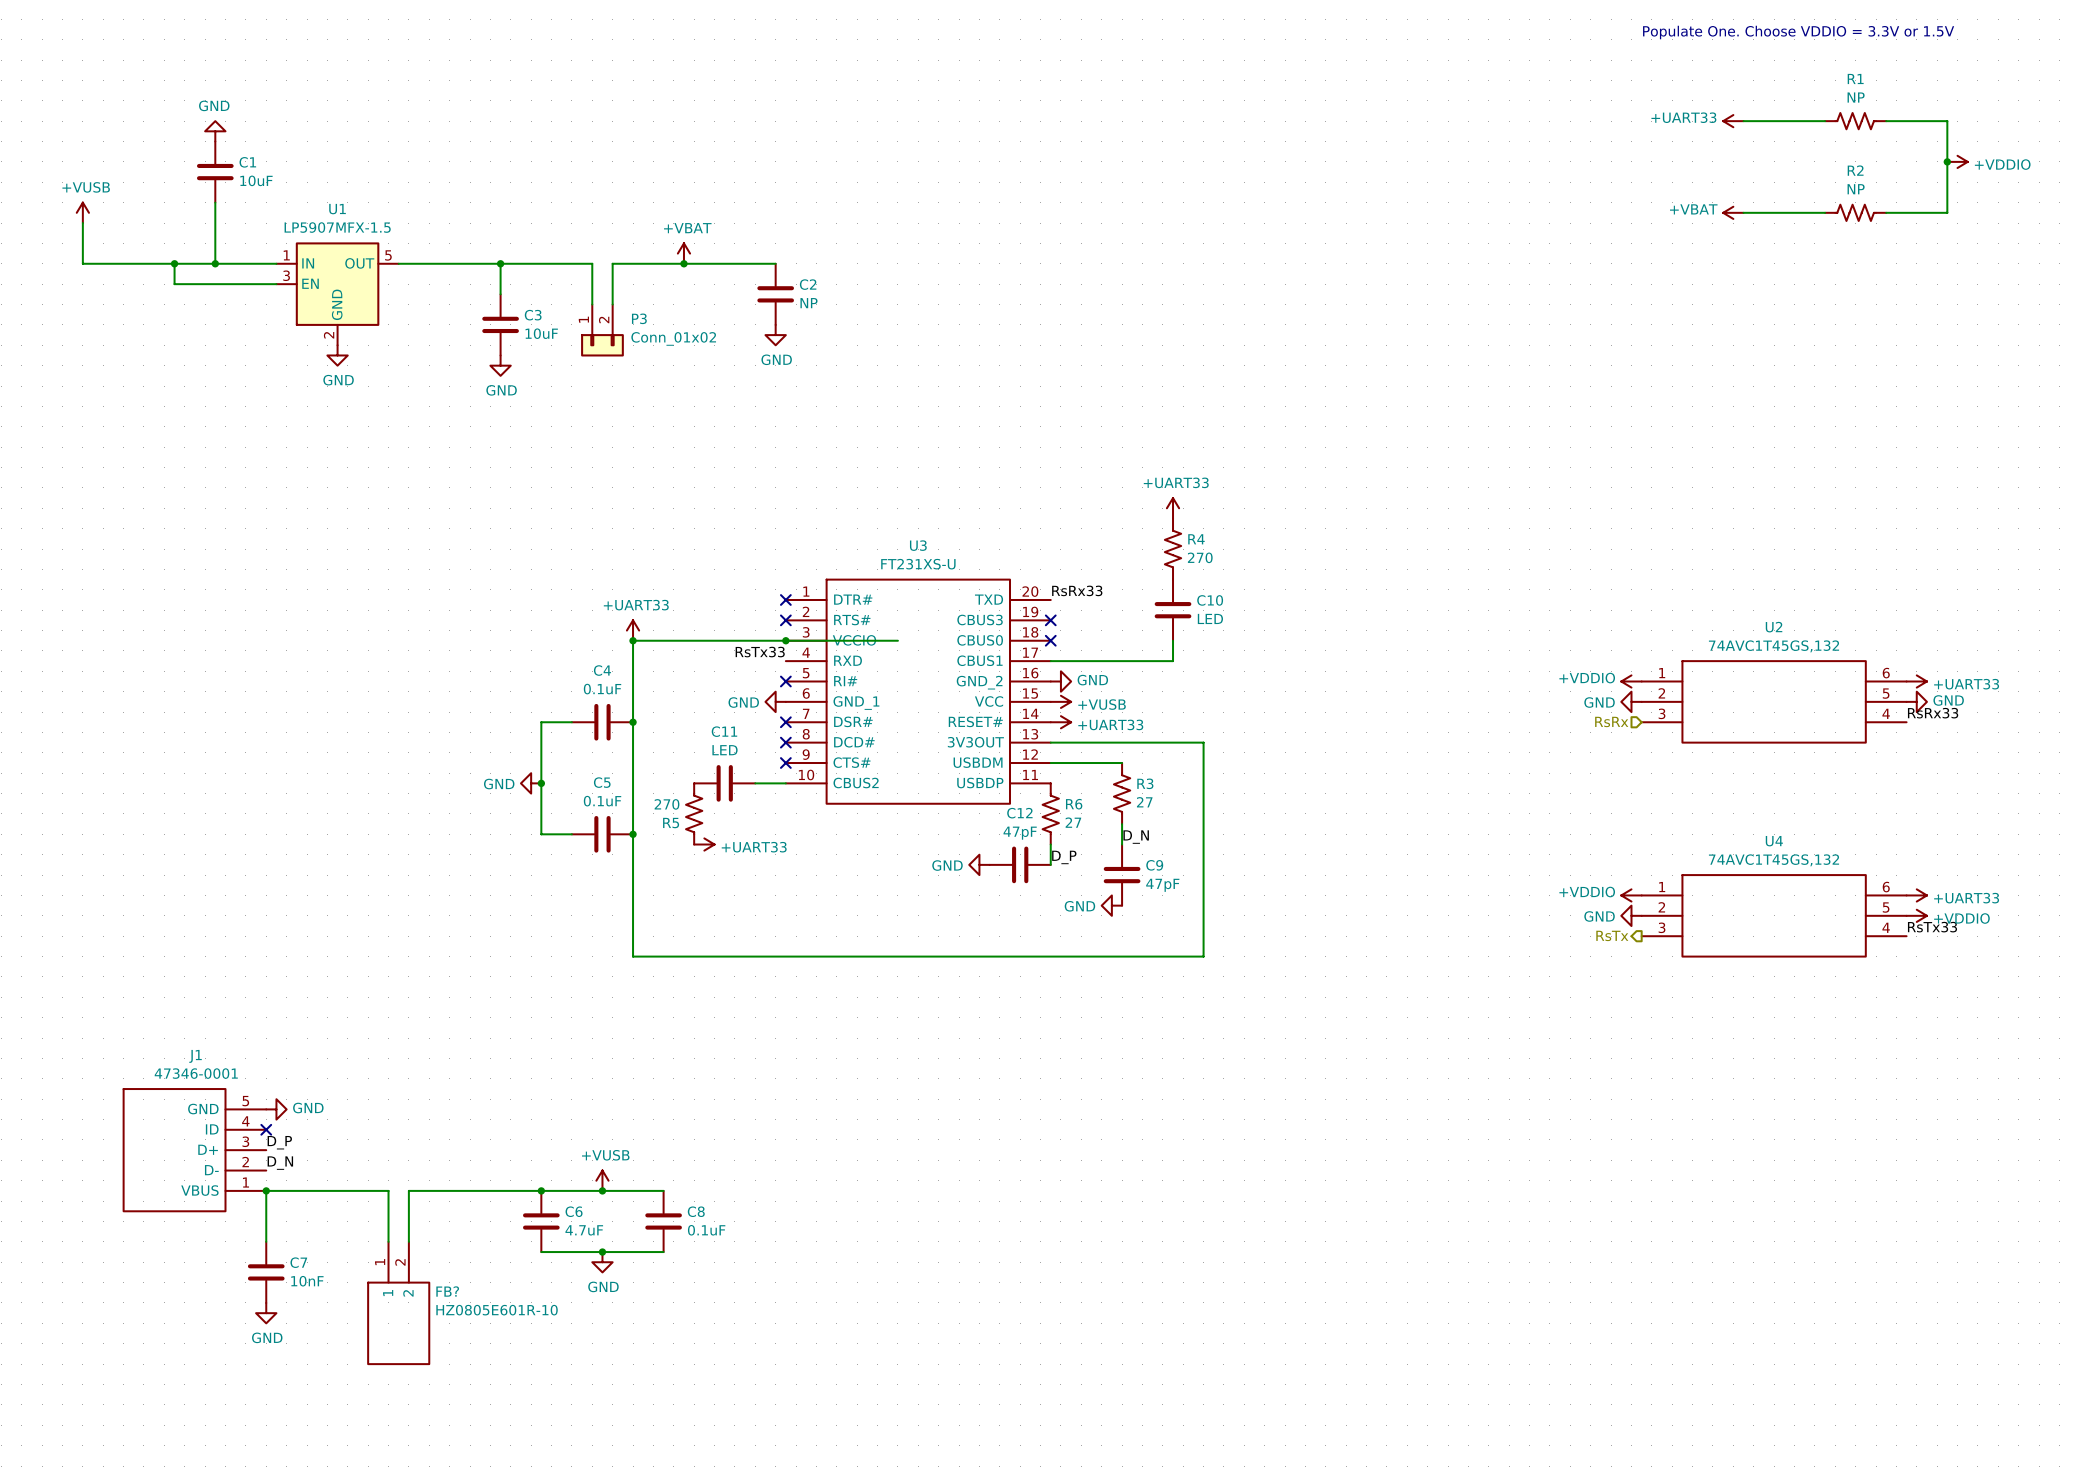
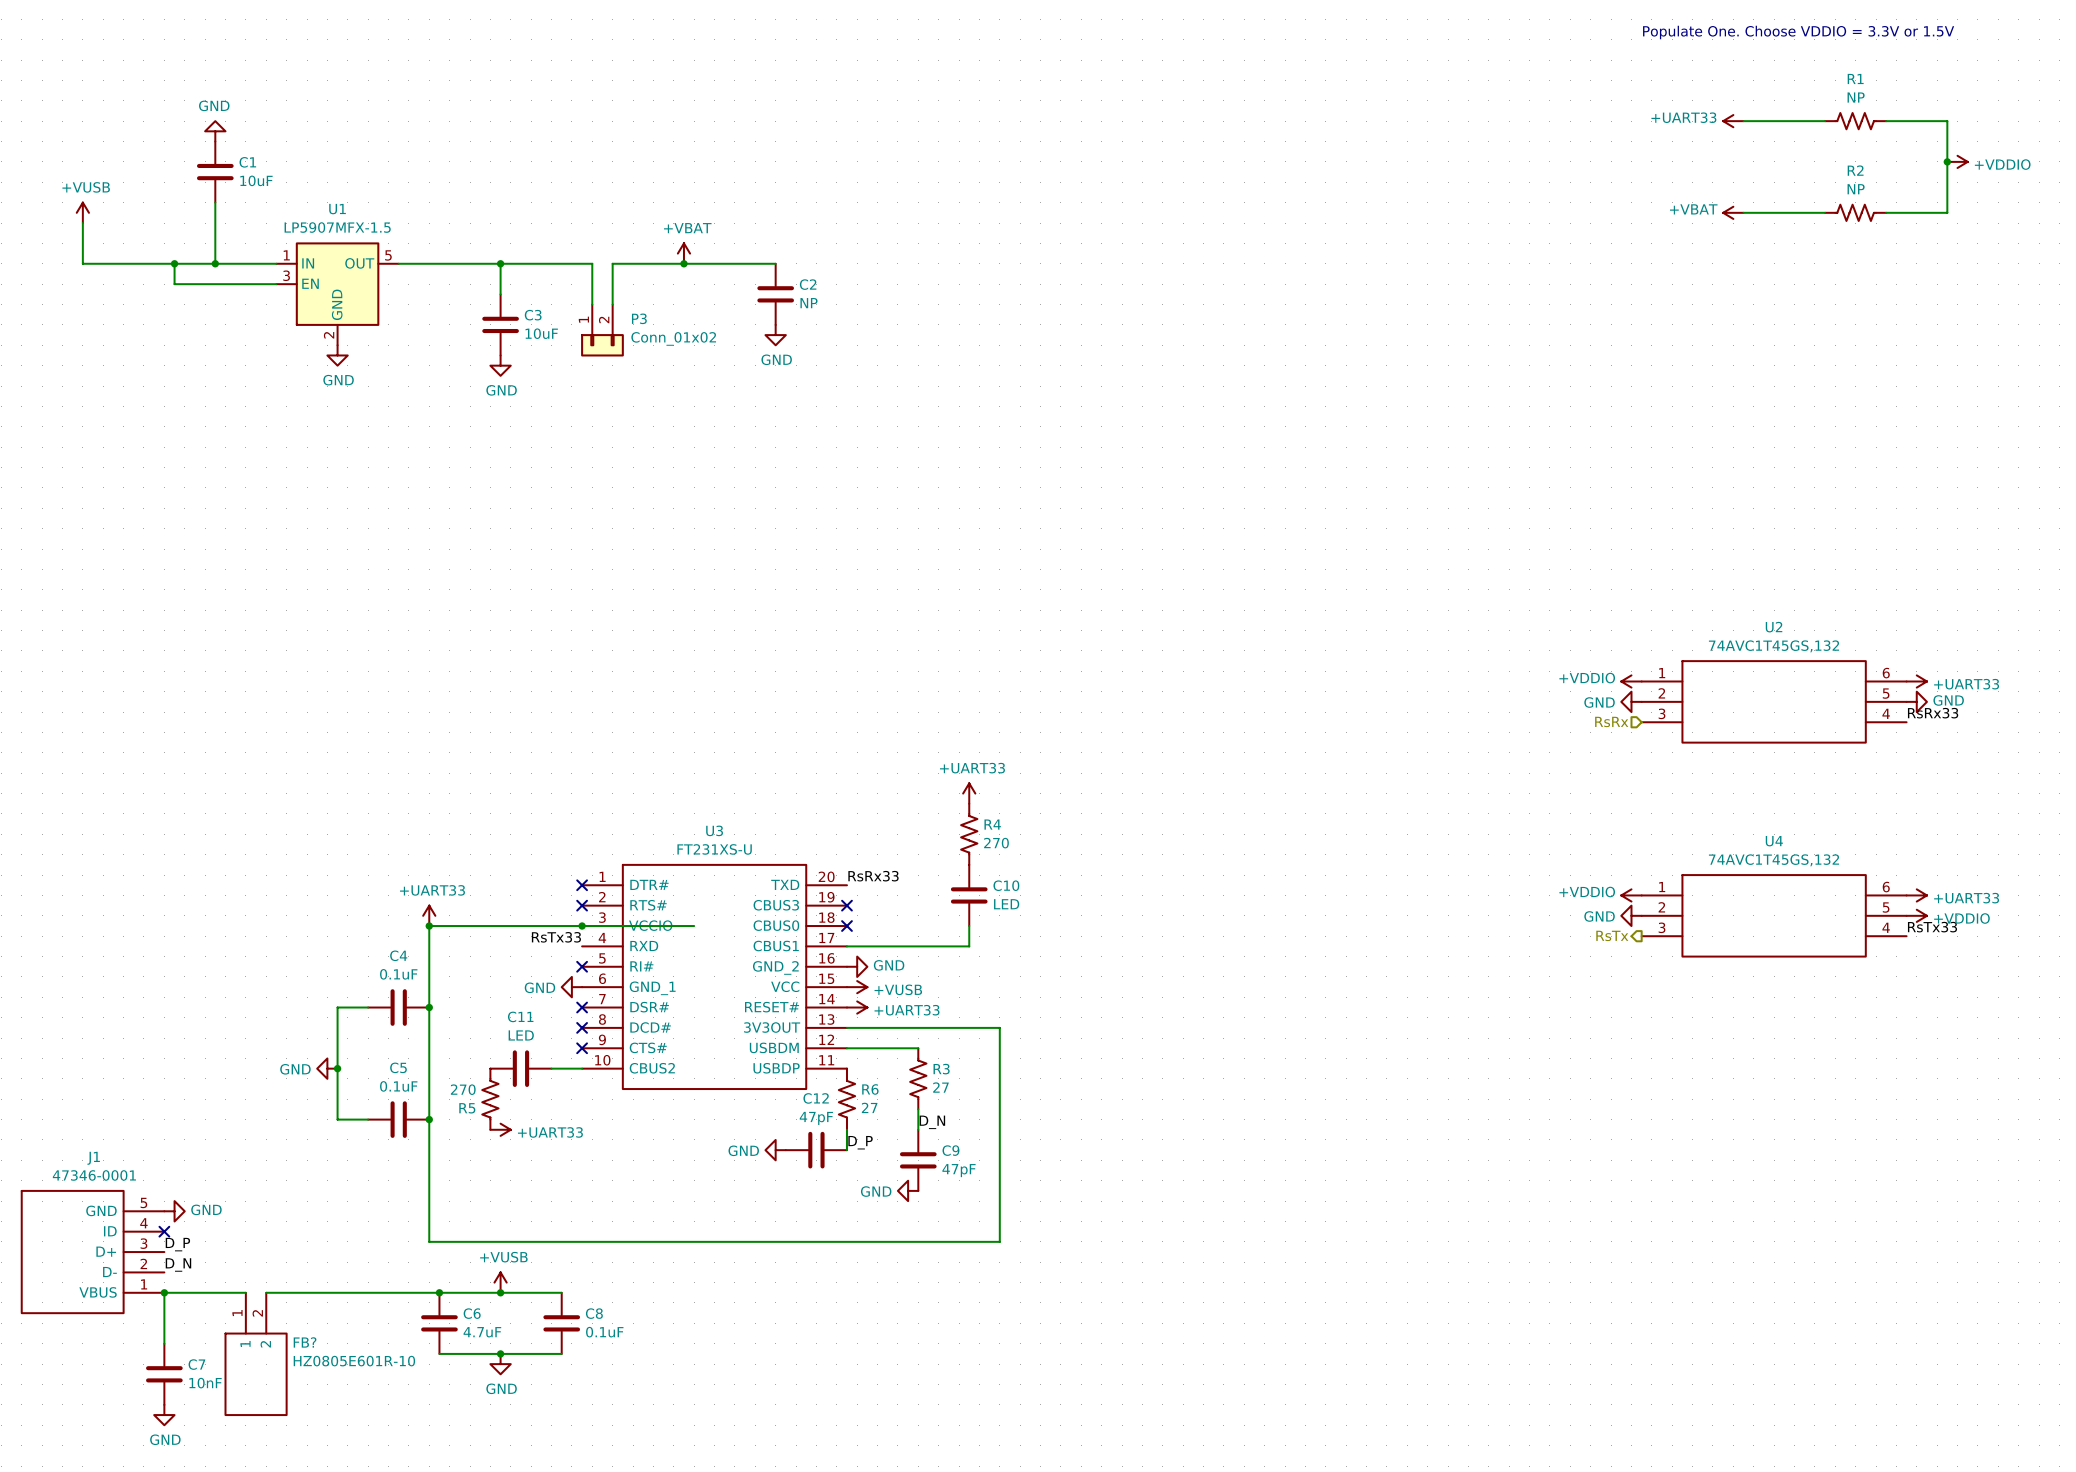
power symbol: +UART33 (1173, 508) -> none
R4 position: (1173, 549) -> (969, 834)
label: RsRx33 (1077, 590) -> none
no-connect mark: (785, 599) -> none
C10 position: (1173, 610) -> (969, 895)
no-connect mark: (785, 620) -> none
no-connect mark: (1050, 620) -> none
power symbol: +UART33 (633, 630) -> none
junction: (633, 640) -> none
junction: (785, 640) -> none
wire: (897, 640) (633, 640) (633, 956) (1203, 956) (1203, 742) (1050, 742) -> none
no-connect mark: (1050, 640) -> none
wire: (1173, 640) (1173, 661) (1050, 661) -> none
label: RsTx33 (760, 652) -> none
no-connect mark: (785, 681) -> none
power symbol: GND (1060, 681) -> none
U3 position: (918, 691) -> (714, 976)
power symbol: GND (775, 701) -> none
power symbol: +VUSB (1060, 701) -> none
wire: (571, 722) (541, 722) (541, 834) (571, 834) -> none
C4 position: (602, 722) -> (398, 1007)
junction: (633, 722) -> none
no-connect mark: (785, 722) -> none
power symbol rotation: 0° (1060, 722) -> 90° counterclockwise (969, 793)
power symbol position: +UART33 (1060, 722) -> +UART33 (969, 793)
power symbol text position: +UART33 (1110, 724) -> +UART33 (972, 768)
no-connect mark: (785, 742) -> none
no-connect mark: (785, 763) -> none
wire: (1050, 763) (1122, 763) -> none
power symbol: GND (531, 783) -> none
junction: (541, 783) -> none
C11 position: (724, 783) -> (520, 1068)
wire: (755, 783) (785, 783) -> none
R3 position: (1122, 793) -> (918, 1078)
R5 position: (694, 813) -> (490, 1099)
R6 position: (1050, 813) -> (846, 1099)
wire: (1122, 824) (1122, 844) -> none
C5 position: (602, 834) -> (398, 1119)
junction: (633, 834) -> none
label: D_N (1136, 837) -> none
power symbol: +UART33 (704, 844) -> none
wire: (1050, 844) (1050, 864) -> none
label: D_P (1064, 857) -> none
power symbol: GND (979, 864) -> none
C12 position: (1020, 864) -> (816, 1150)
C9 position: (1122, 875) -> (918, 1160)
label: none -> RsRx33 (873, 876)
no-connect mark: none -> (582, 885)
no-connect mark: none -> (582, 905)
no-connect mark: none -> (846, 905)
power symbol: GND (1111, 905) -> none
power symbol: none -> +UART33 (429, 915)
junction: none -> (429, 926)
junction: none -> (582, 926)
wire: none -> (694, 926) (429, 926) (429, 1241) (999, 1241) (999, 1027) (846, 1027)
no-connect mark: none -> (846, 926)
wire: none -> (969, 926) (969, 946) (846, 946)
label: none -> RsTx33 (556, 937)
no-connect mark: none -> (582, 966)
power symbol: none -> GND (857, 966)
power symbol: none -> GND (571, 987)
power symbol: none -> +VUSB (857, 987)
wire: none -> (368, 1007) (337, 1007) (337, 1119) (368, 1119)
junction: none -> (429, 1007)
no-connect mark: none -> (582, 1007)
power symbol: none -> +UART33 (857, 1007)
no-connect mark: none -> (582, 1027)
no-connect mark: none -> (582, 1048)
wire: none -> (846, 1048) (918, 1048)
junction: none -> (337, 1068)
wire: none -> (551, 1068) (582, 1068)
power symbol rotation: 0° (276, 1109) -> 180° (327, 1068)
power symbol position: GND (276, 1109) -> GND (327, 1068)
wire: none -> (918, 1109) (918, 1129)
junction: none -> (429, 1119)
label: none -> D_N (932, 1122)
no-connect mark: (266, 1129) -> none
power symbol: none -> +UART33 (500, 1129)
wire: none -> (846, 1129) (846, 1150)
label position: D_P (279, 1142) -> D_P (177, 1244)
label: none -> D_P (860, 1142)
J1 position: (194, 1150) -> (92, 1252)
power symbol: none -> GND (775, 1150)
label position: D_N (280, 1163) -> D_N (178, 1264)
power symbol position: +VUSB (602, 1180) -> +VUSB (500, 1282)
junction: (266, 1190) -> none
junction: (541, 1190) -> none
junction: (602, 1190) -> none
wire: (663, 1190) (408, 1190) (408, 1241) -> none
power symbol: none -> GND (908, 1190)
power symbol: none -> GND (174, 1211)
C6 position: (541, 1221) -> (439, 1323)
C8 position: (663, 1221) -> (561, 1323)
no-connect mark: none -> (164, 1231)
wire: (266, 1241) (266, 1190) (388, 1190) (388, 1241) -> none
wire: (541, 1252) (663, 1252) -> (439, 1353) (561, 1353)
junction: (602, 1252) -> none
power symbol: GND (602, 1262) -> none
C7 position: (266, 1272) -> (164, 1374)
junction: none -> (164, 1292)
wire: none -> (245, 1292) (164, 1292) (164, 1343)
wire: none -> (266, 1292) (561, 1292)
junction: none -> (439, 1292)
junction: none -> (500, 1292)
FB? position: (398, 1303) -> (256, 1354)
power symbol: GND (266, 1313) -> none
junction: none -> (500, 1353)
power symbol: none -> GND (500, 1364)
power symbol: none -> GND (164, 1415)

